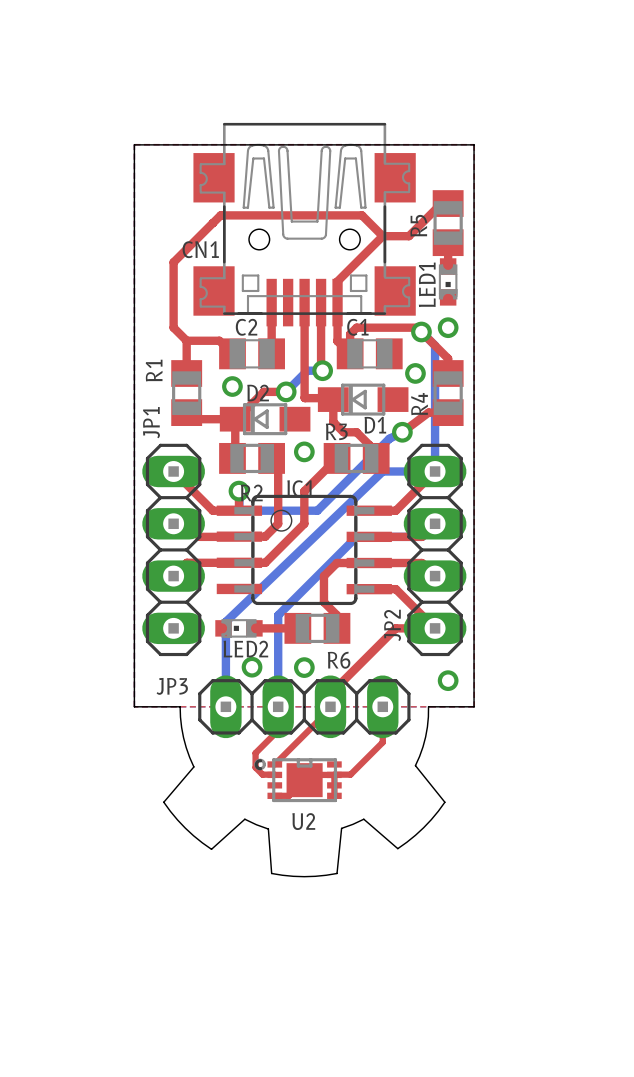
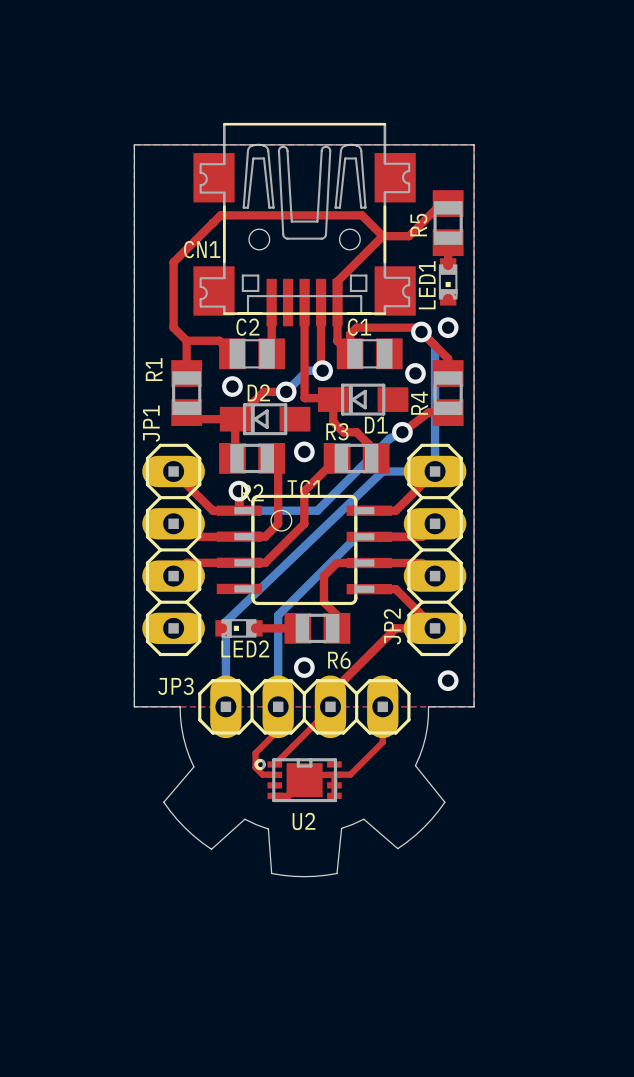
via: (252, 667) -> none

